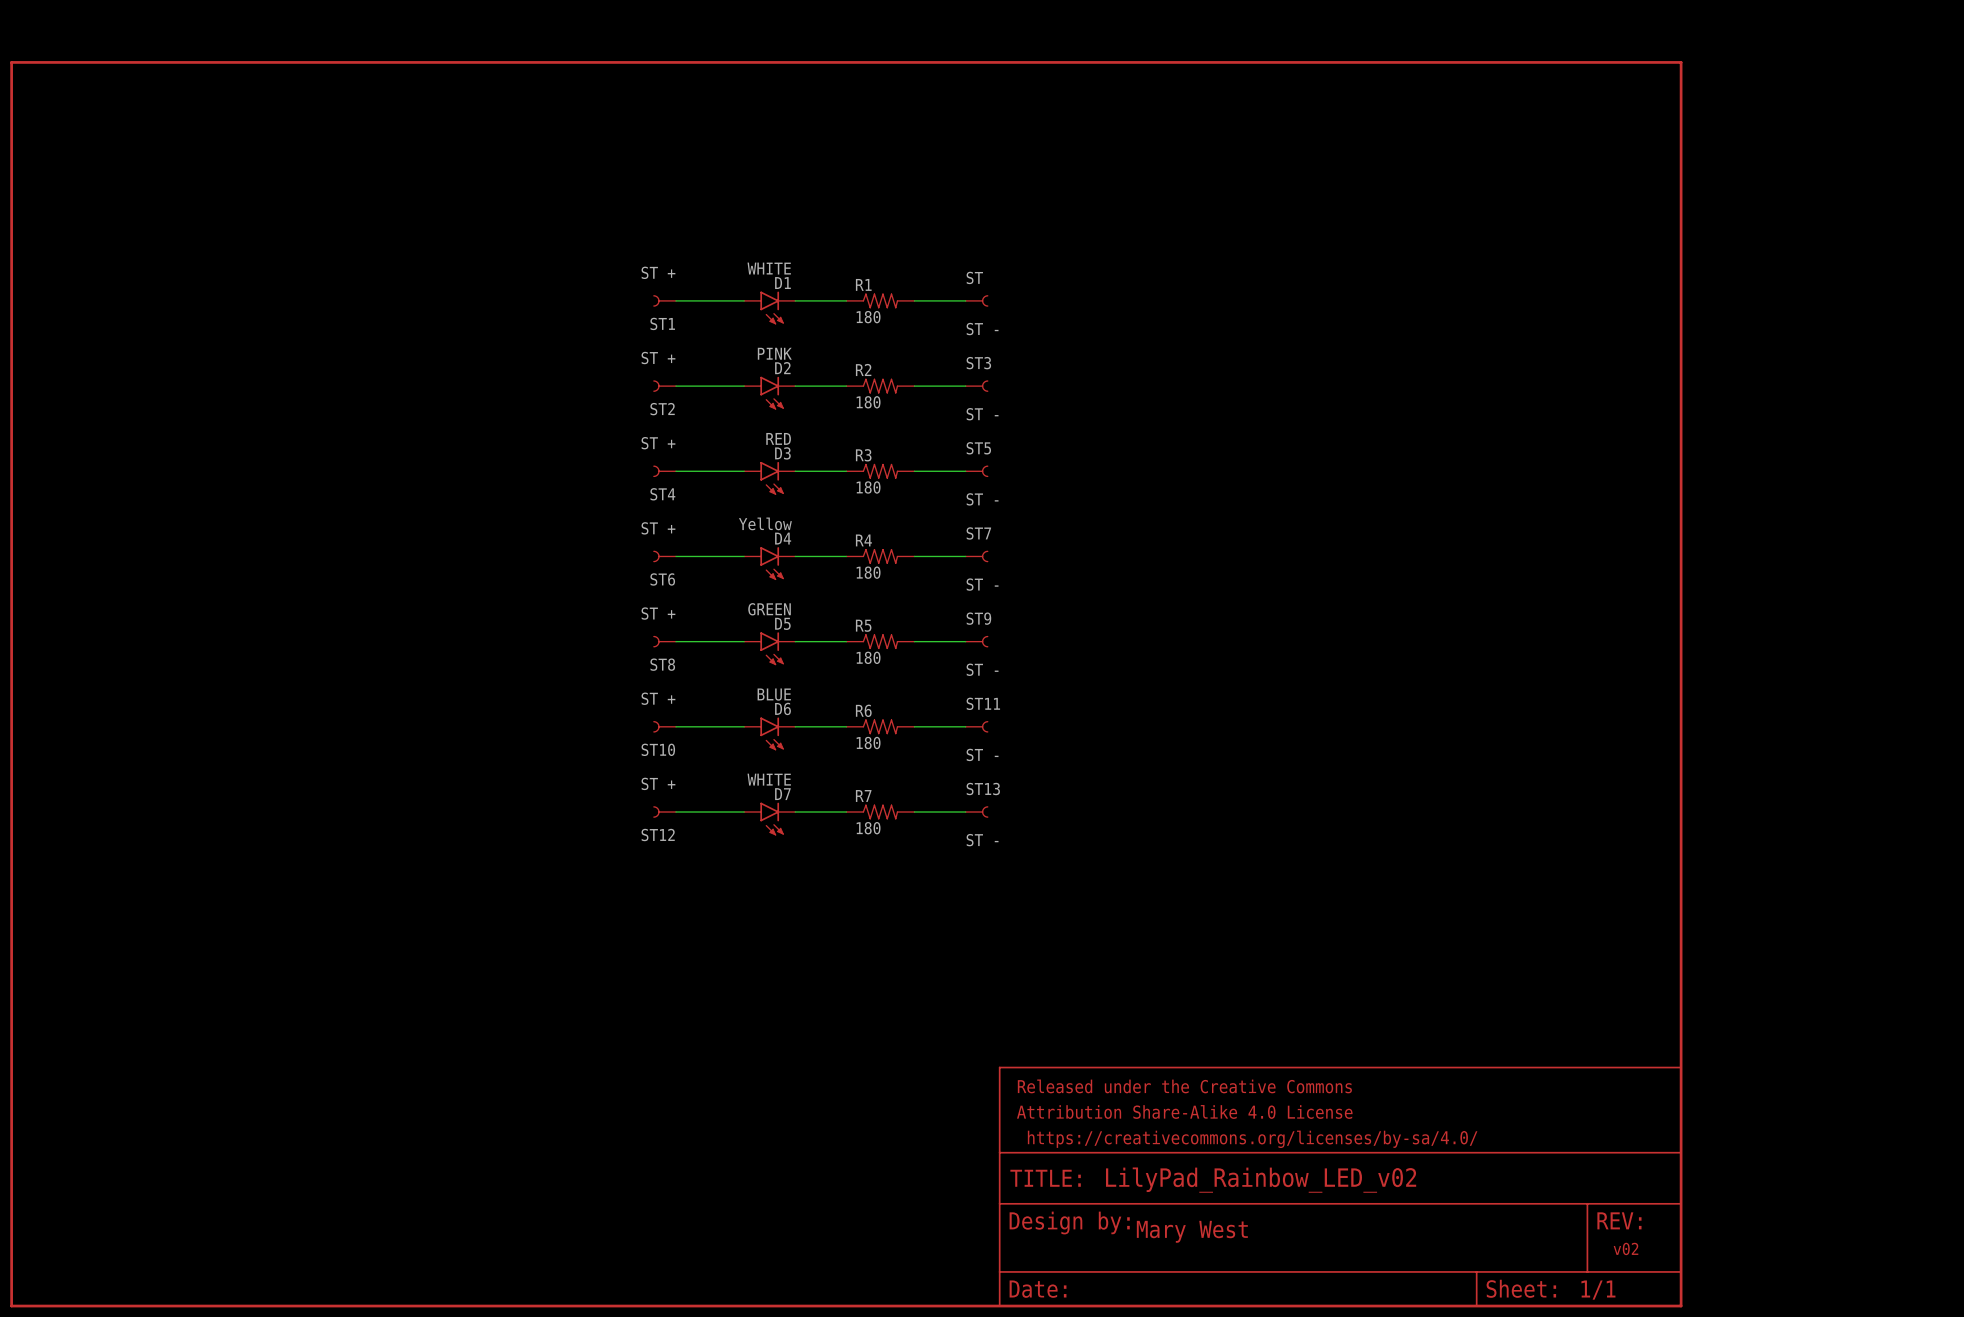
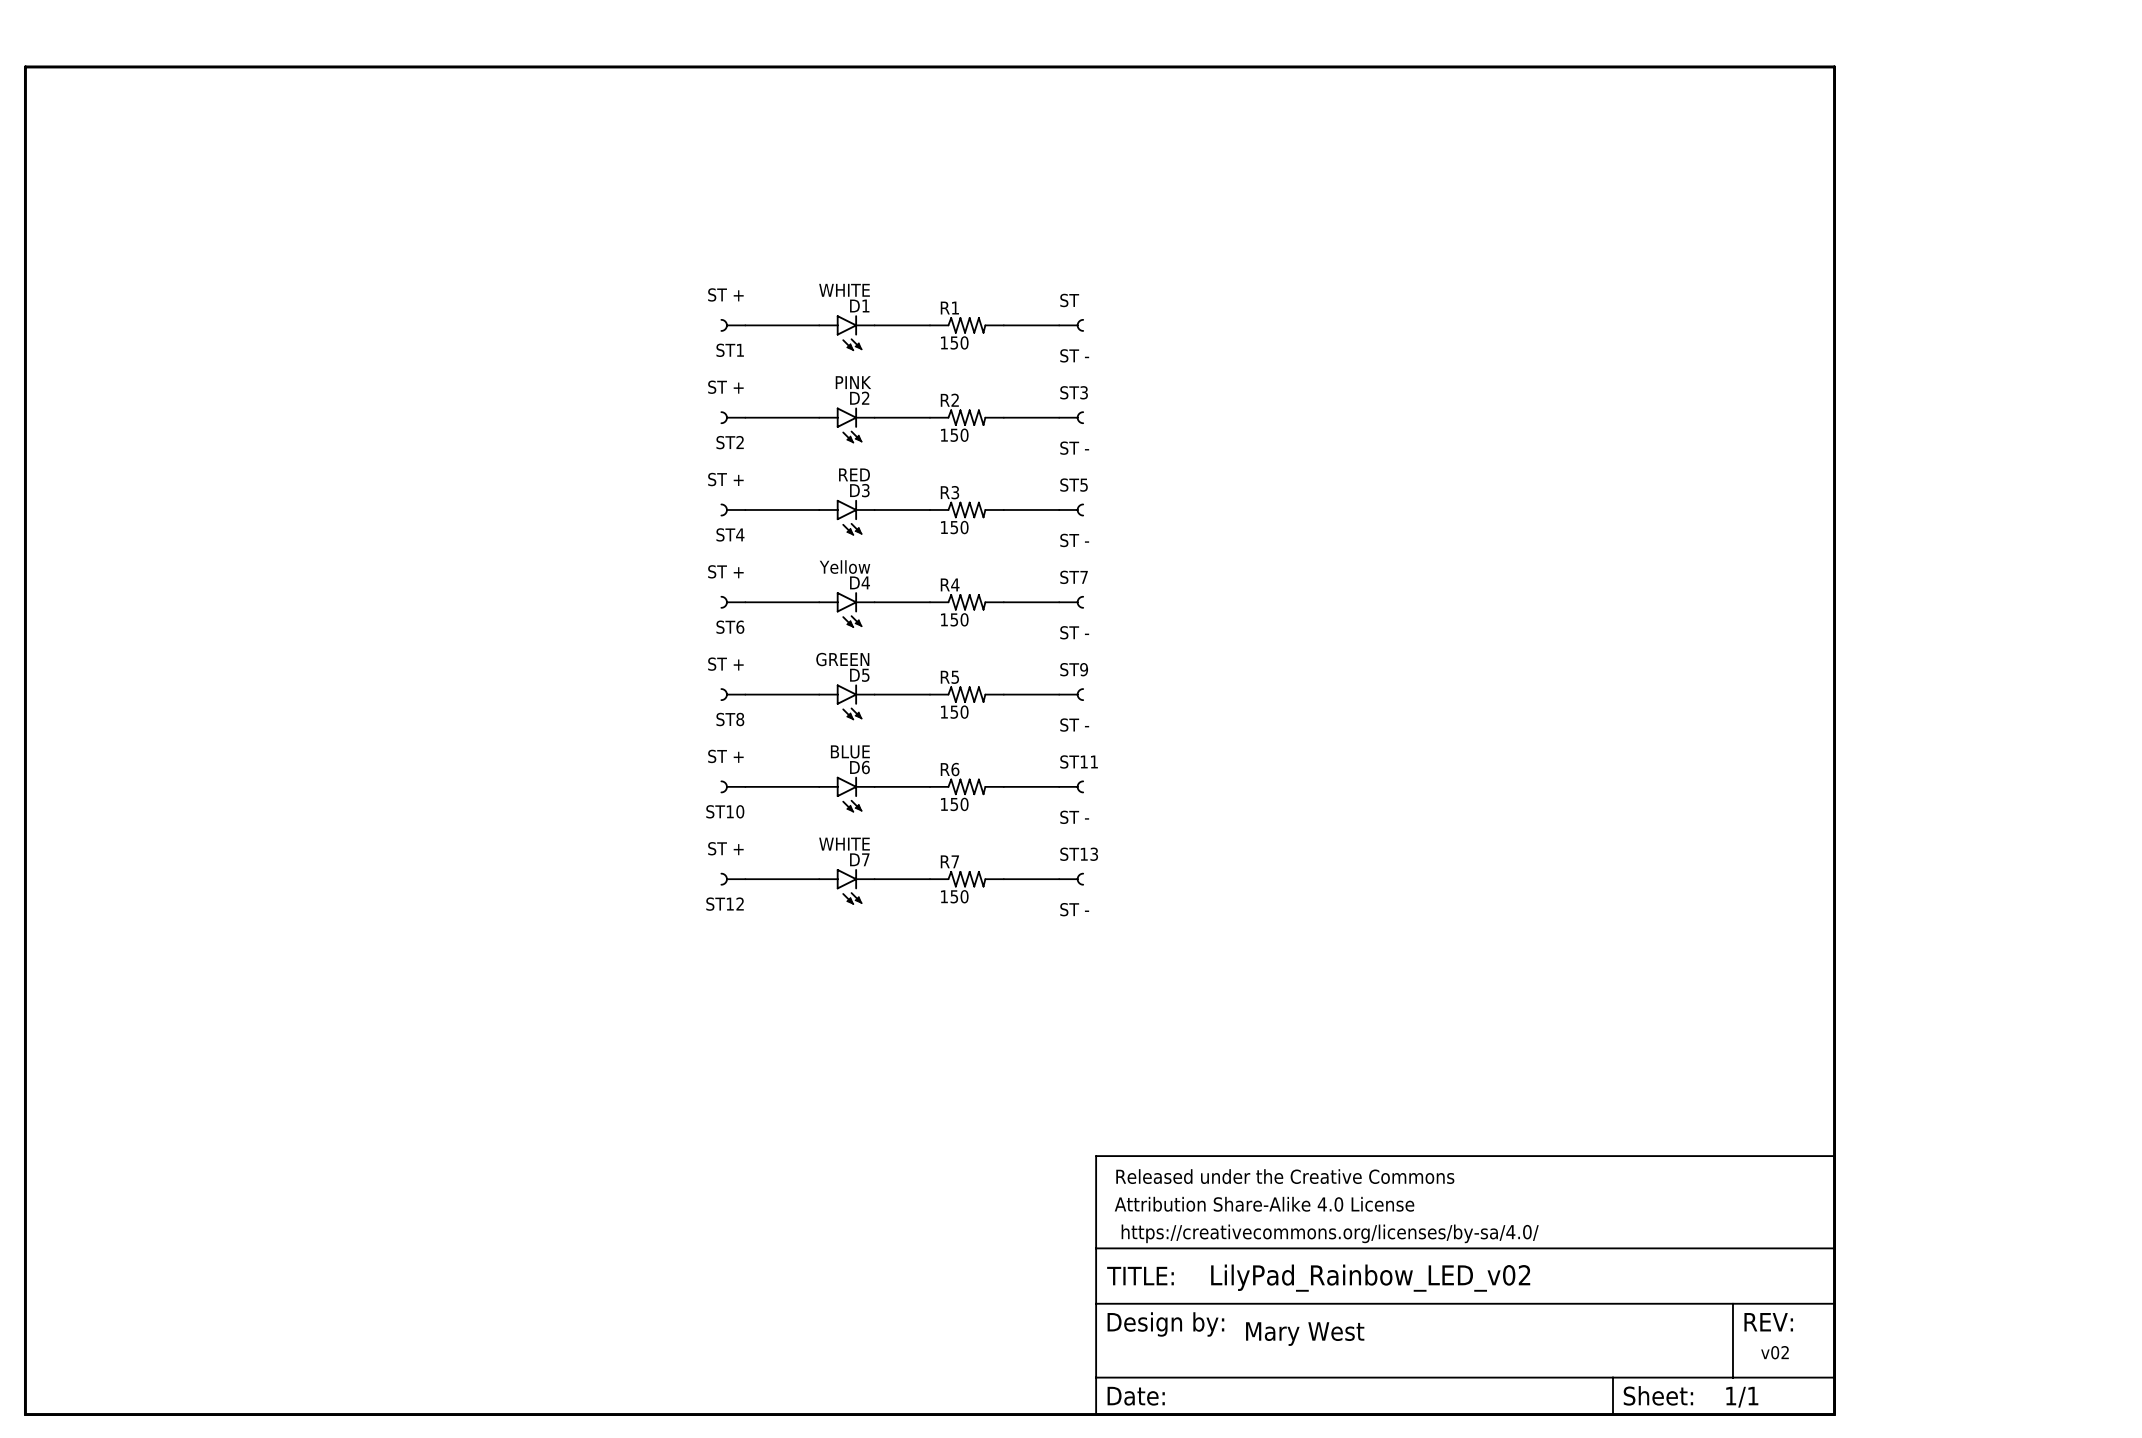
R1 value: 180 (868, 317) -> 150 (954, 342)
R2 value: 180 (868, 402) -> 150 (954, 435)
R3 value: 180 (868, 487) -> 150 (954, 527)
R4 value: 180 (868, 572) -> 150 (954, 619)
R5 value: 180 (868, 657) -> 150 (954, 712)
R6 value: 180 (868, 743) -> 150 (954, 804)
R7 value: 180 (868, 828) -> 150 (954, 896)

